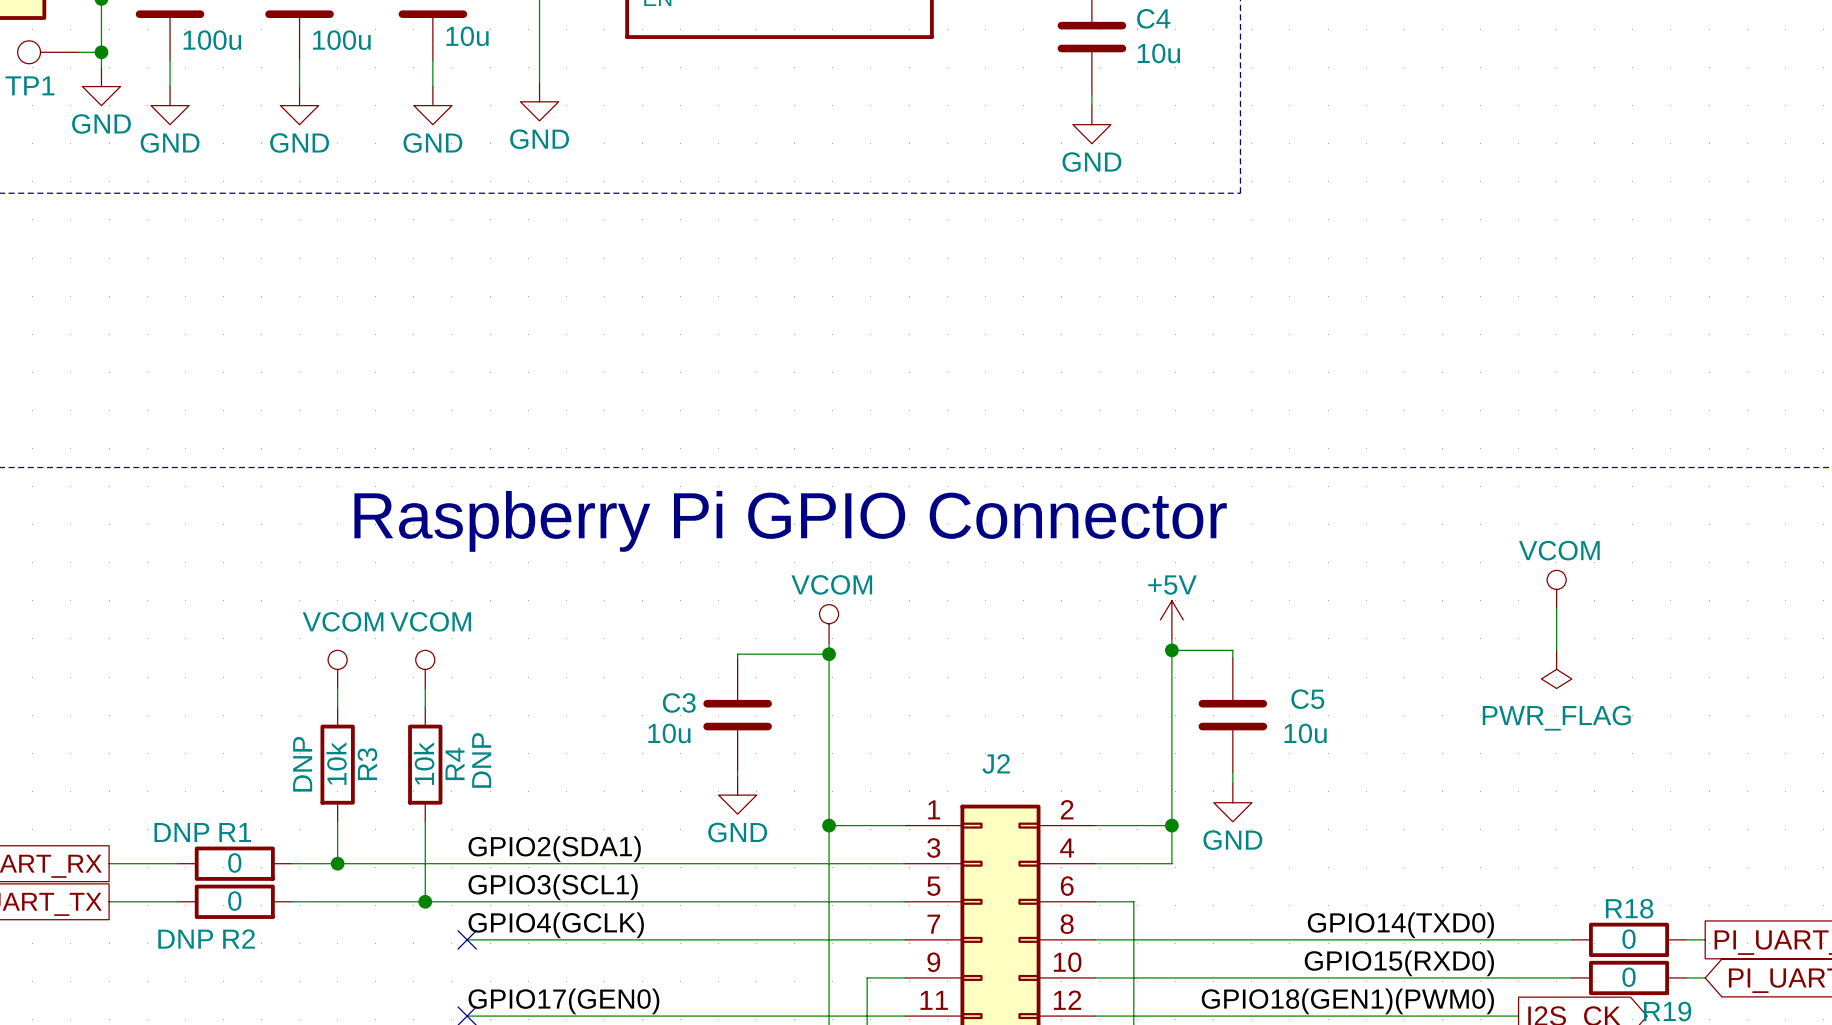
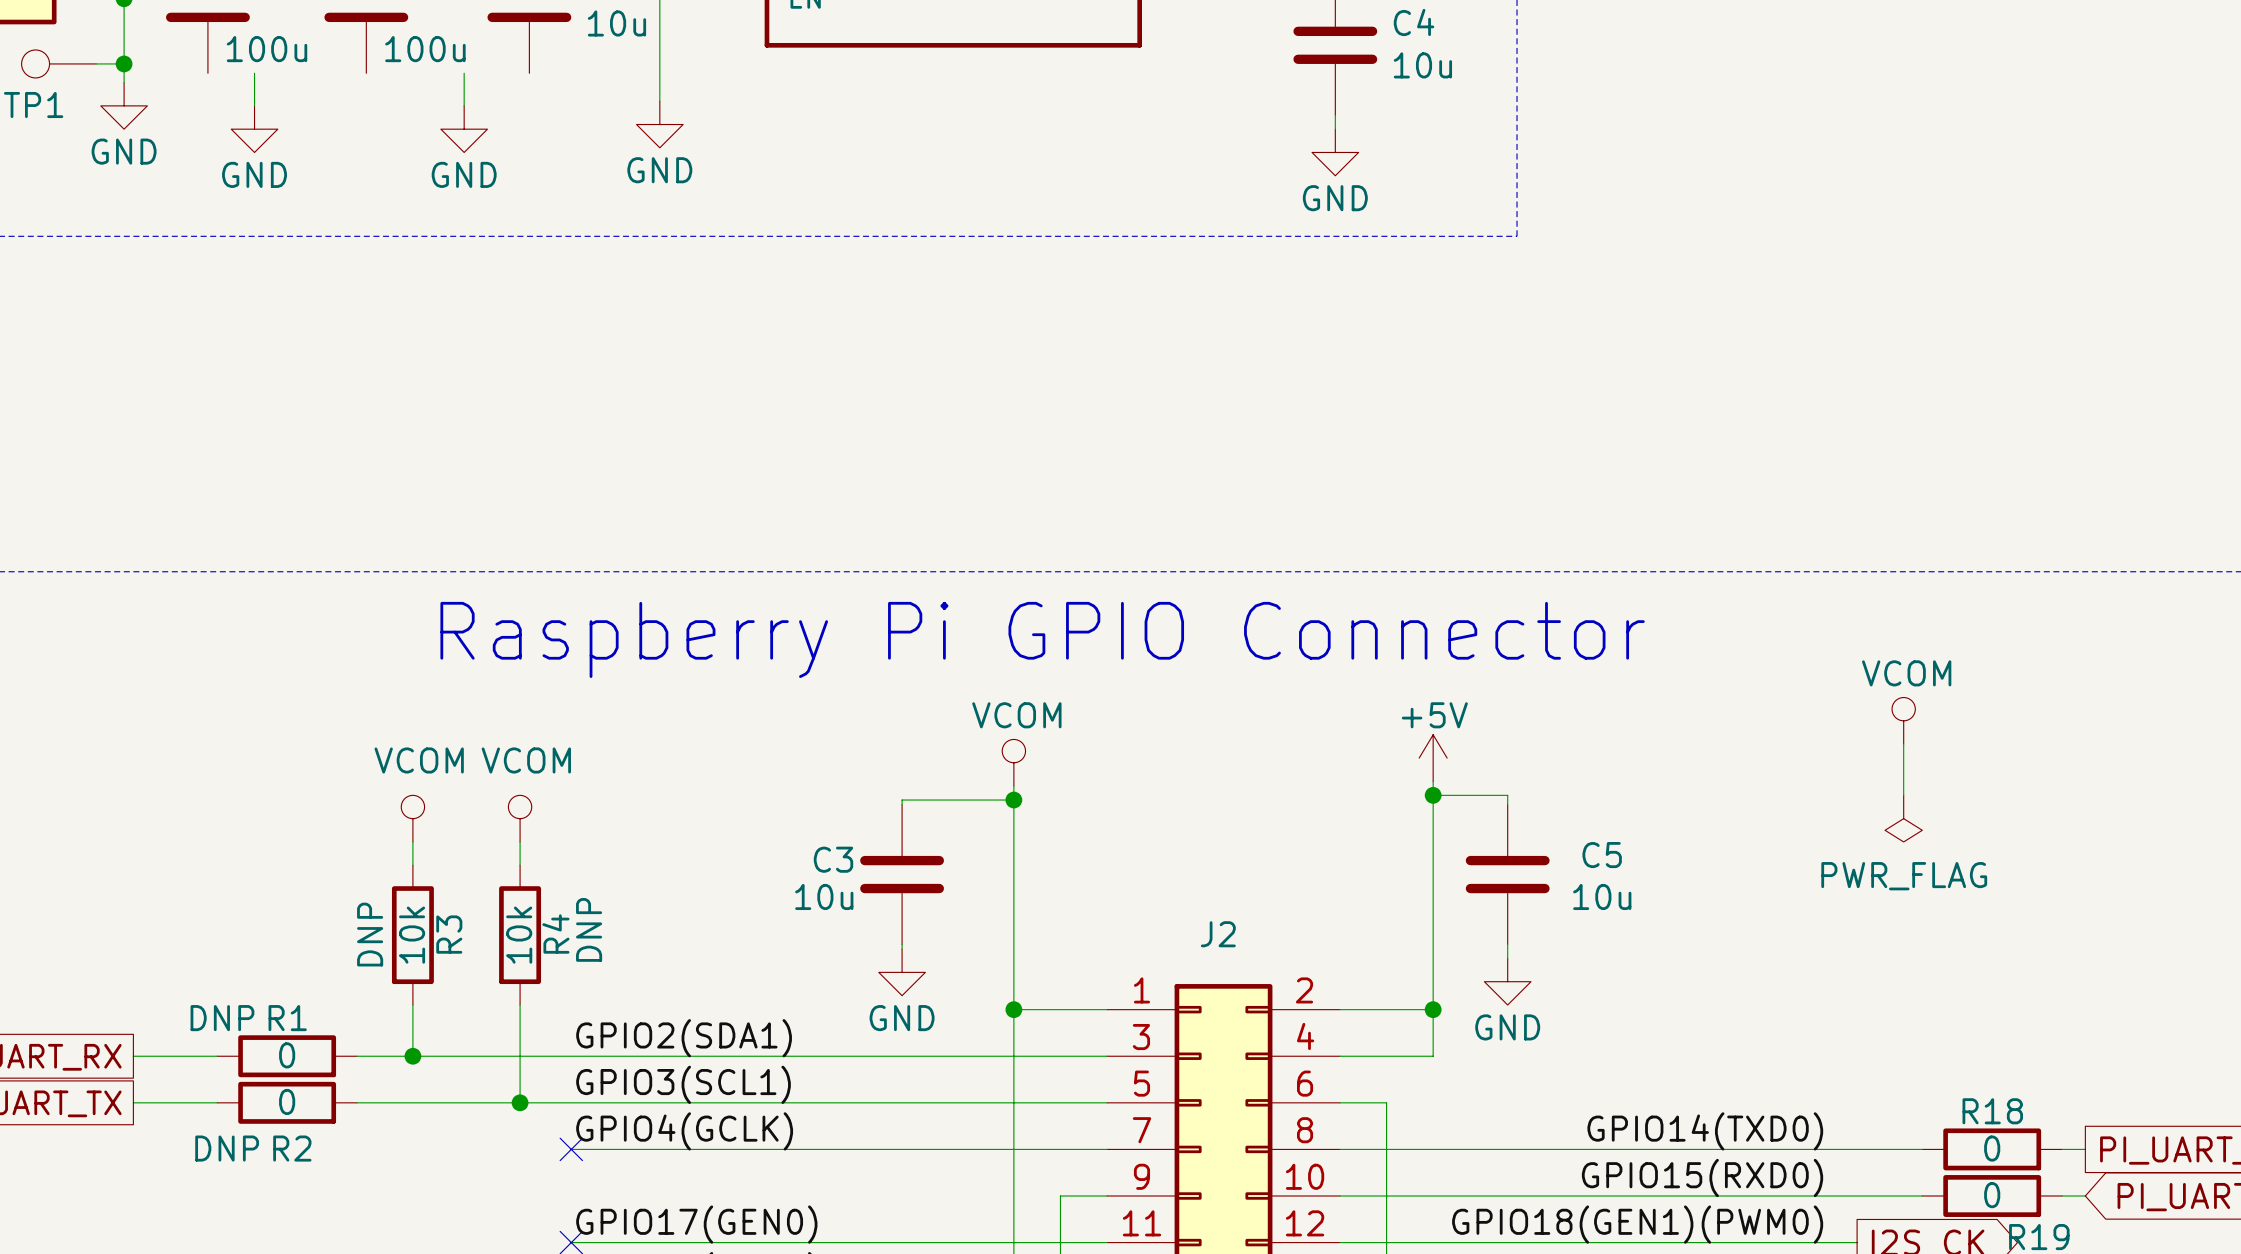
part value position: 10u (467, 36) -> 10u (616, 23)
wire: (170, 59) (170, 86) -> (254, 73) (254, 105)
wire: (299, 59) (299, 86) -> none
wire: (432, 59) (432, 86) -> (464, 73) (464, 105)
power symbol position: GND (170, 105) -> GND (254, 129)
power symbol: GND (299, 105) -> none
power symbol: none -> GND (464, 129)
power symbol: GND (432, 105) -> none

